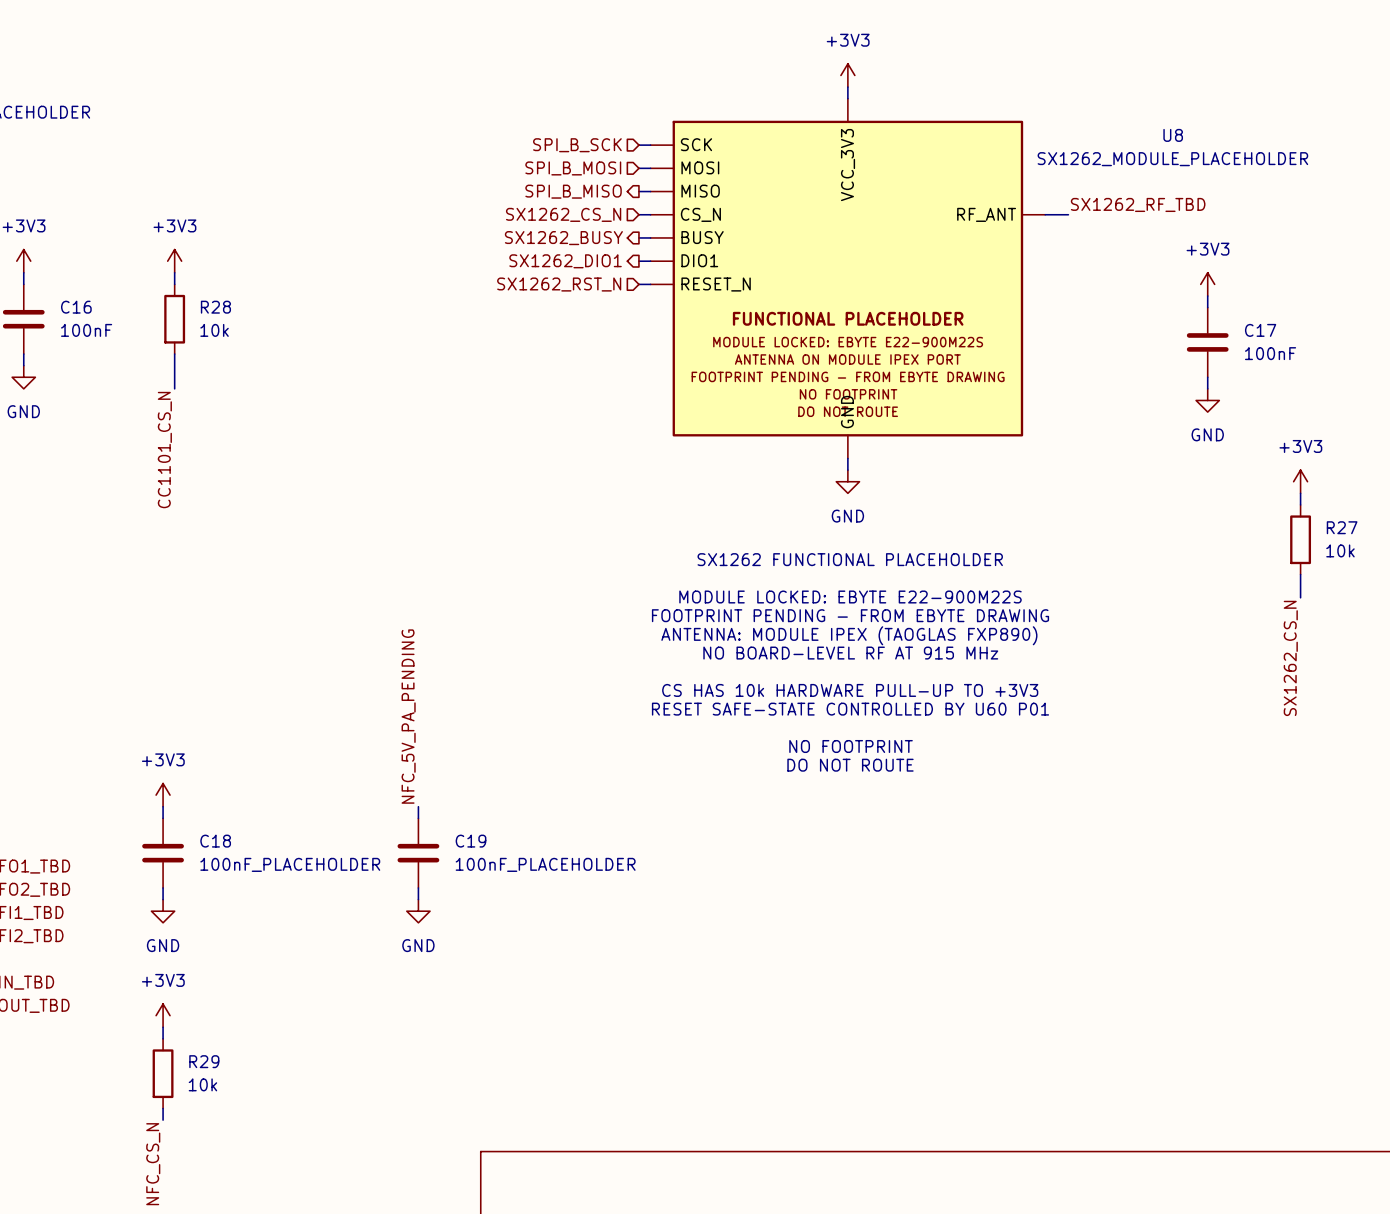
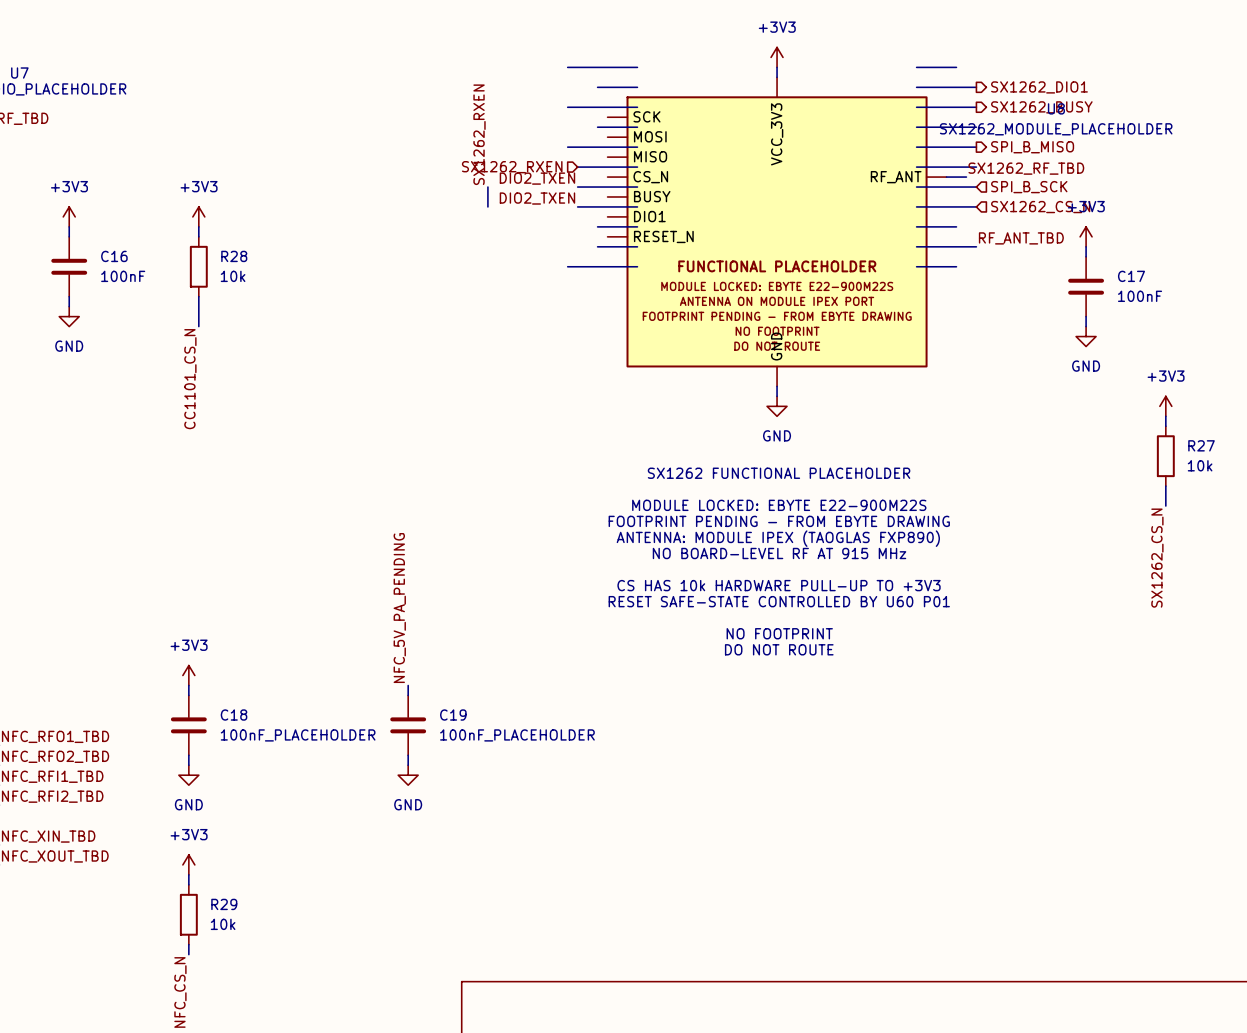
wire: none -> (567, 67) (637, 67)
wire: none -> (916, 67) (956, 67)
wire: none -> (597, 87) (637, 87)
wire: none -> (916, 87) (976, 87)
hierarchical label: none -> SX1262_DIO1 (1039, 87)
wire: none -> (567, 107) (637, 107)
wire: none -> (916, 107) (976, 107)
hierarchical label: none -> SX1262_BUSY (1041, 107)
hierarchical label: SPI_B_SCK (577, 145) -> none
wire: (638, 145) (650, 145) -> none
wire: none -> (597, 127) (637, 127)
wire: none -> (916, 127) (976, 127)
label: none -> SX1262_RXEN (479, 134)
hierarchical label: SPI_B_MOSI (573, 168) -> none
wire: (638, 168) (650, 168) -> none
wire: none -> (567, 147) (637, 147)
wire: none -> (916, 147) (976, 147)
hierarchical label: none -> SPI_B_MISO (1032, 147)
hierarchical label: SPI_B_MISO (573, 191) -> none
wire: (638, 191) (650, 191) -> none
wire: none -> (577, 167) (637, 167)
wire: none -> (916, 167) (976, 167)
hierarchical label: SX1262_CS_N (563, 214) -> SX1262_RXEN (512, 167)
wire: (638, 214) (650, 214) -> none
label: none -> DIO2_TXEN (537, 178)
wire: none -> (487, 187) (487, 206)
wire: none -> (577, 187) (637, 187)
wire: none -> (916, 187) (976, 187)
hierarchical label: none -> SPI_B_SCK (1029, 187)
wire: (638, 237) (650, 237) -> none
hierarchical label: SX1262_BUSY (563, 238) -> none
label: none -> DIO2_TXEN (537, 198)
wire: none -> (577, 206) (637, 206)
wire: none -> (916, 206) (976, 206)
hierarchical label: none -> SX1262_CS_N (1040, 207)
hierarchical label: SX1262_DIO1 (565, 261) -> none
wire: (638, 261) (650, 261) -> none
wire: none -> (597, 226) (637, 226)
wire: none -> (916, 226) (956, 226)
hierarchical label: SX1262_RST_N (559, 284) -> none
wire: (638, 284) (650, 284) -> none
label: none -> RF_ANT_TBD (1021, 238)
wire: none -> (597, 246) (637, 246)
wire: none -> (916, 246) (976, 246)
wire: none -> (567, 266) (637, 266)
wire: none -> (916, 266) (956, 266)

